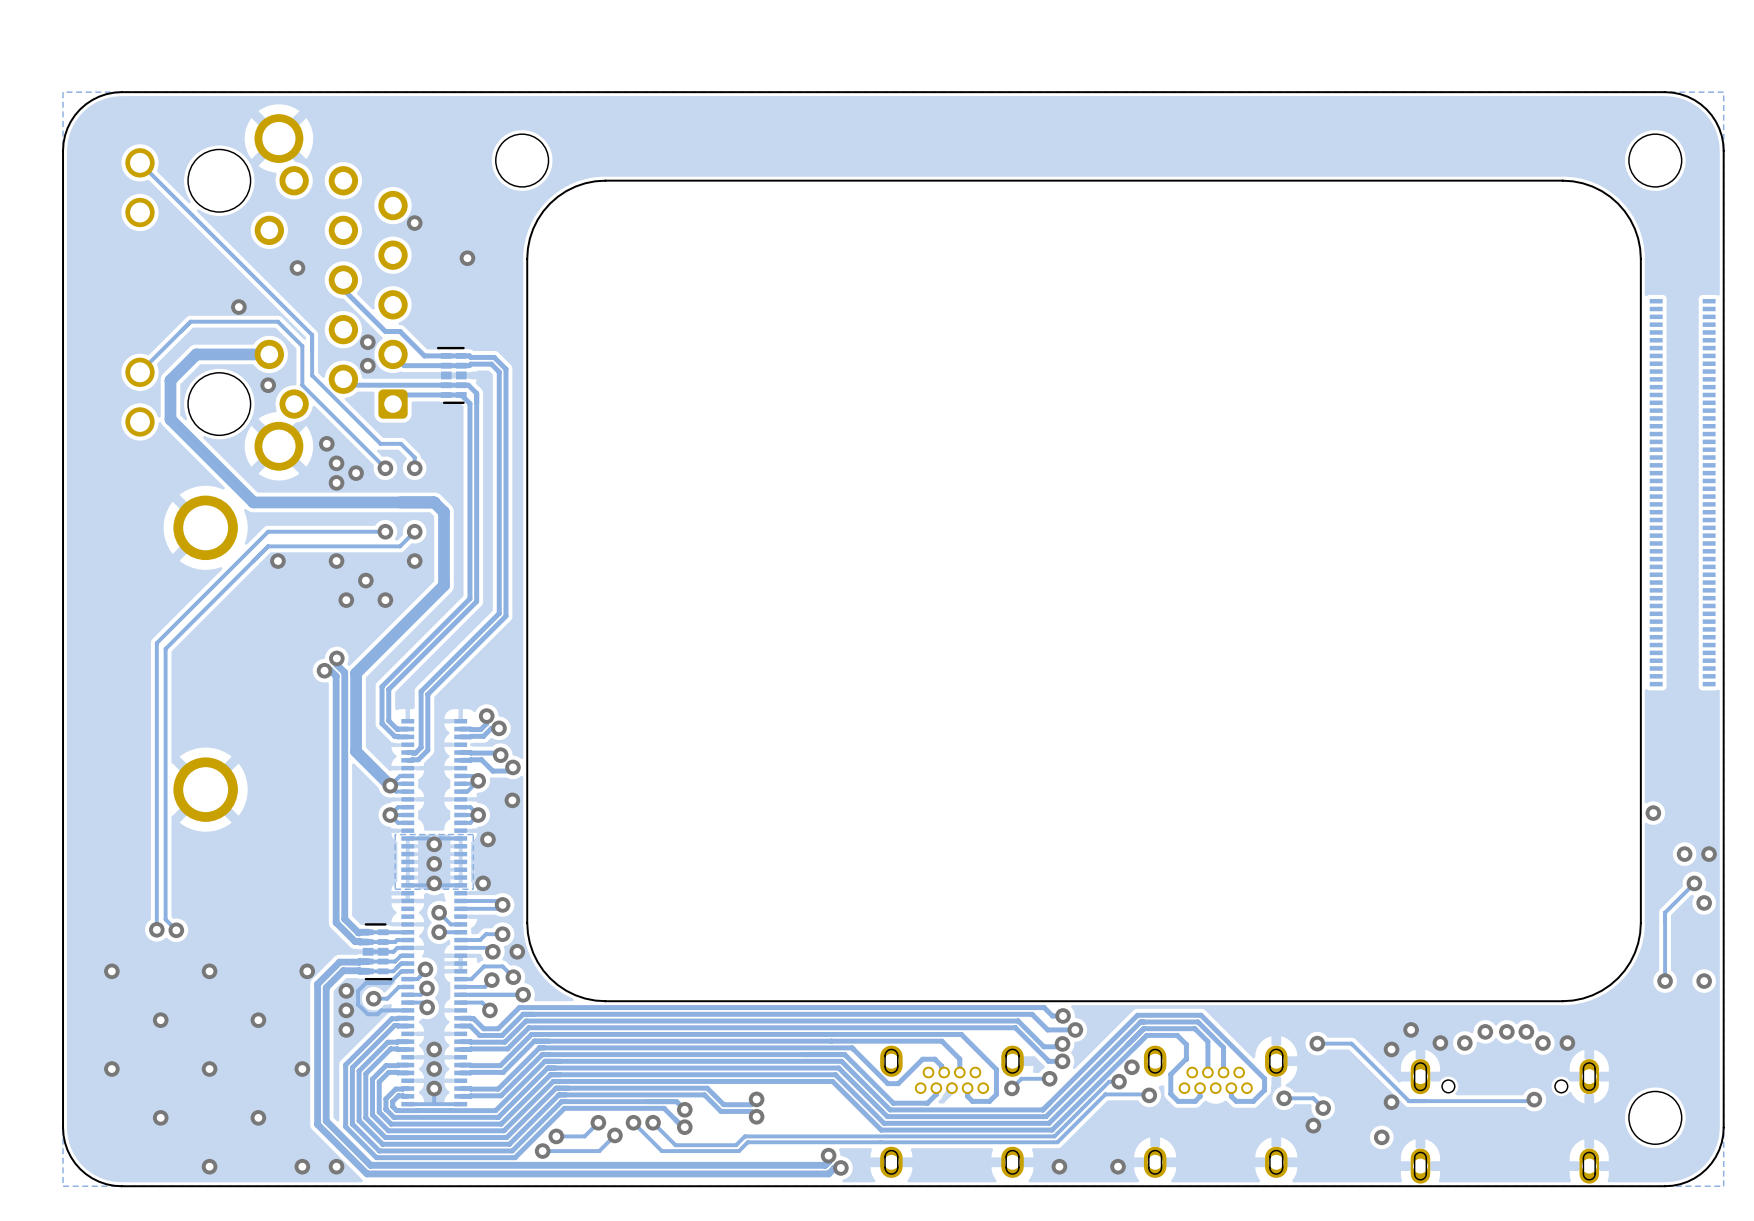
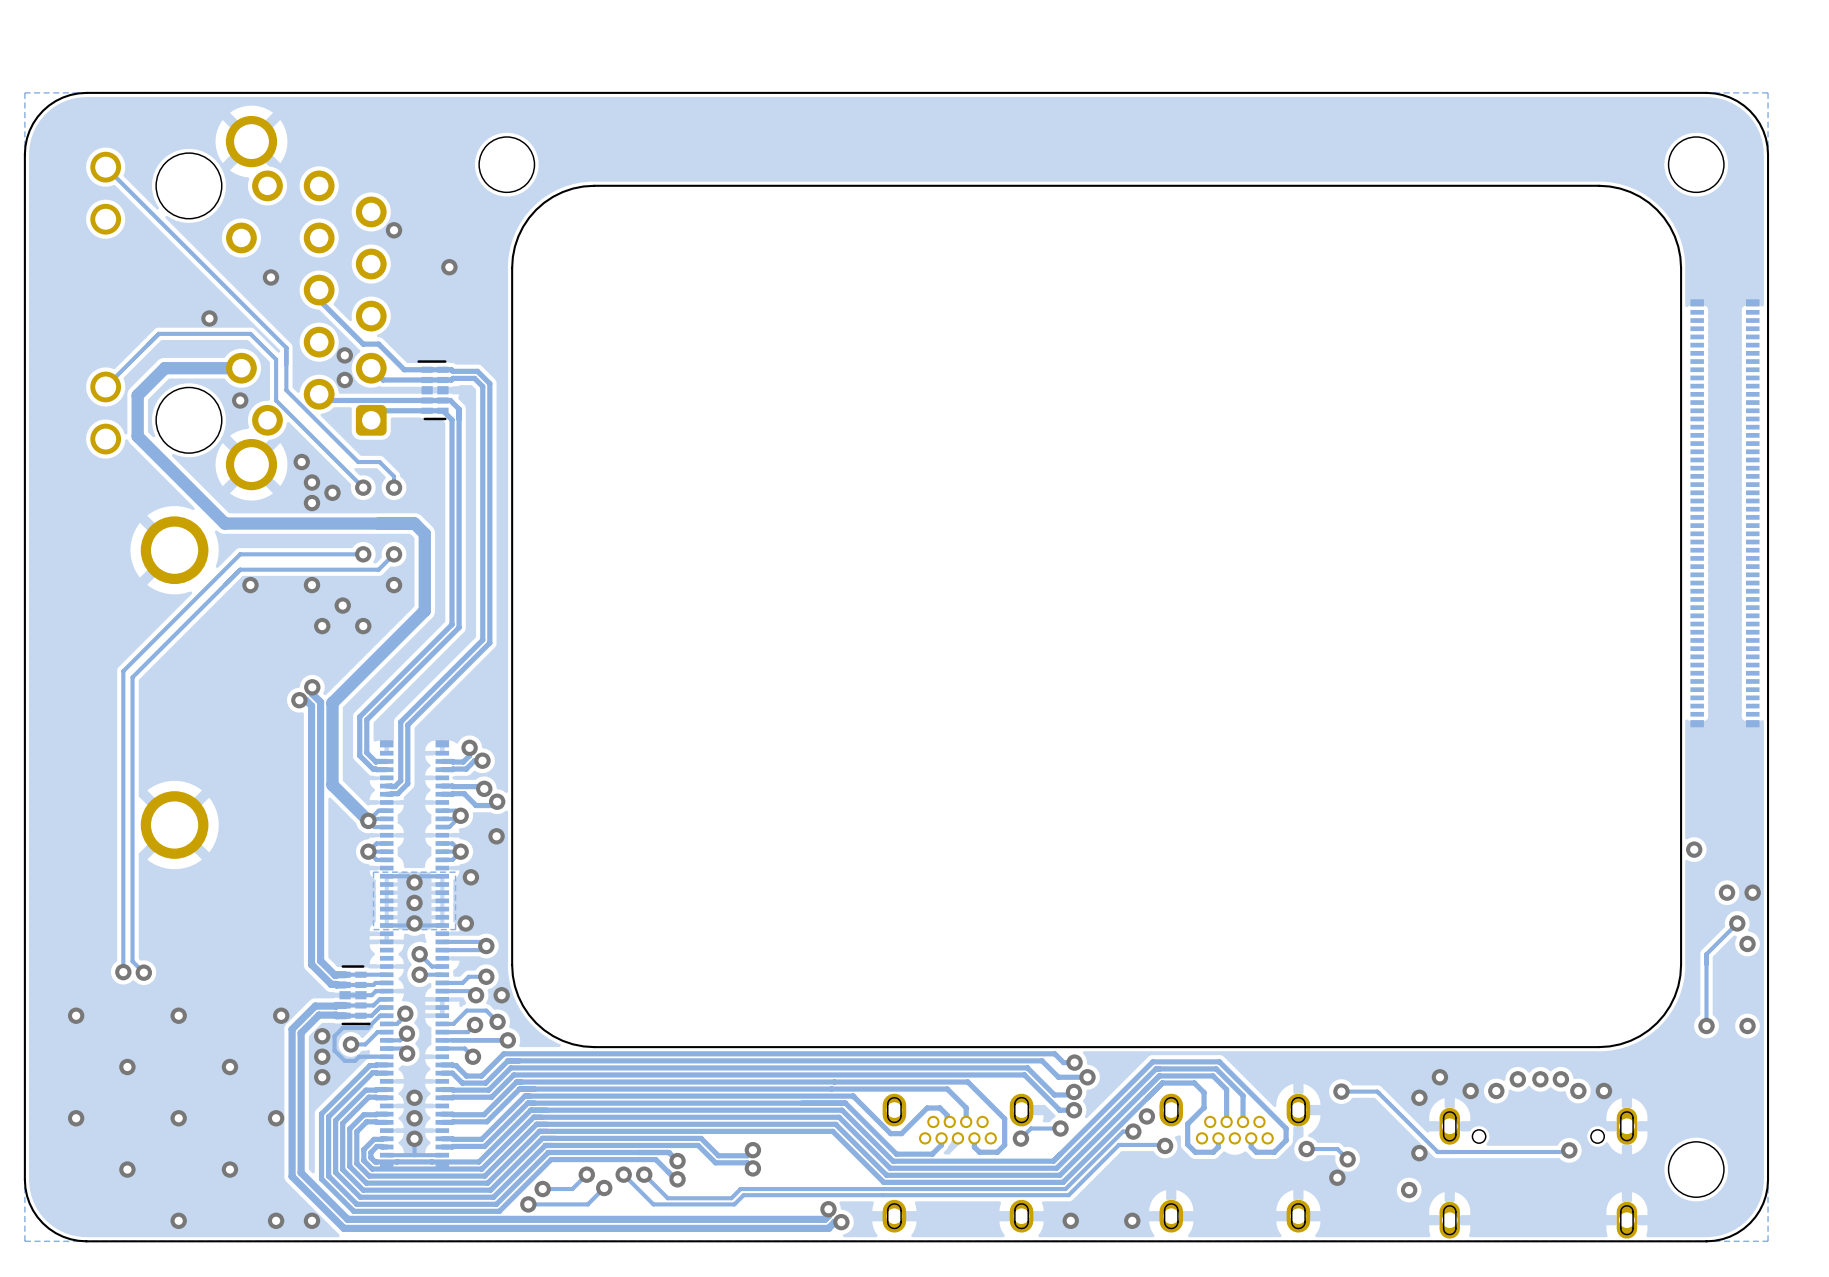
part footprint: [1649, 298, 1716, 687] -> [1690, 299, 1760, 728]
part footprint: [401, 719, 468, 1107] -> [379, 740, 450, 1169]

